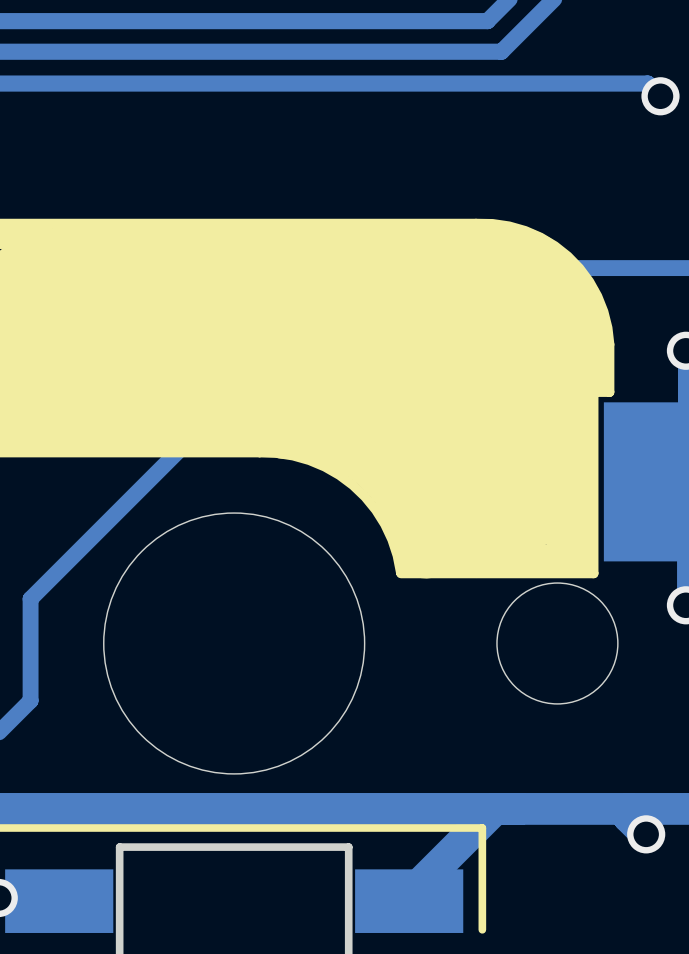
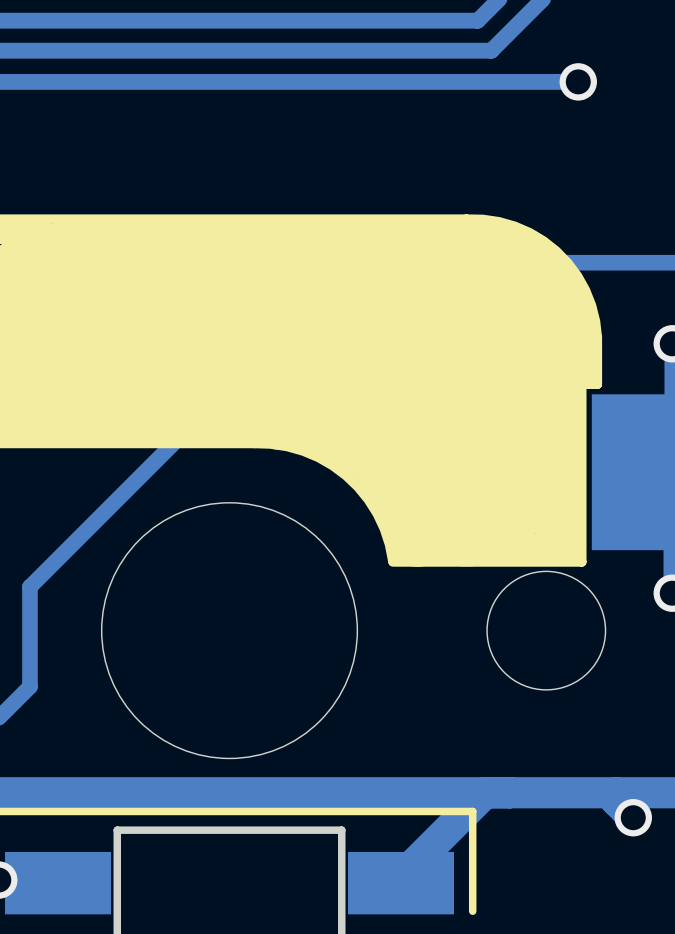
track: (590, 83) (647, 83) (660, 96) -> none
via position: (660, 96) -> (578, 81)

